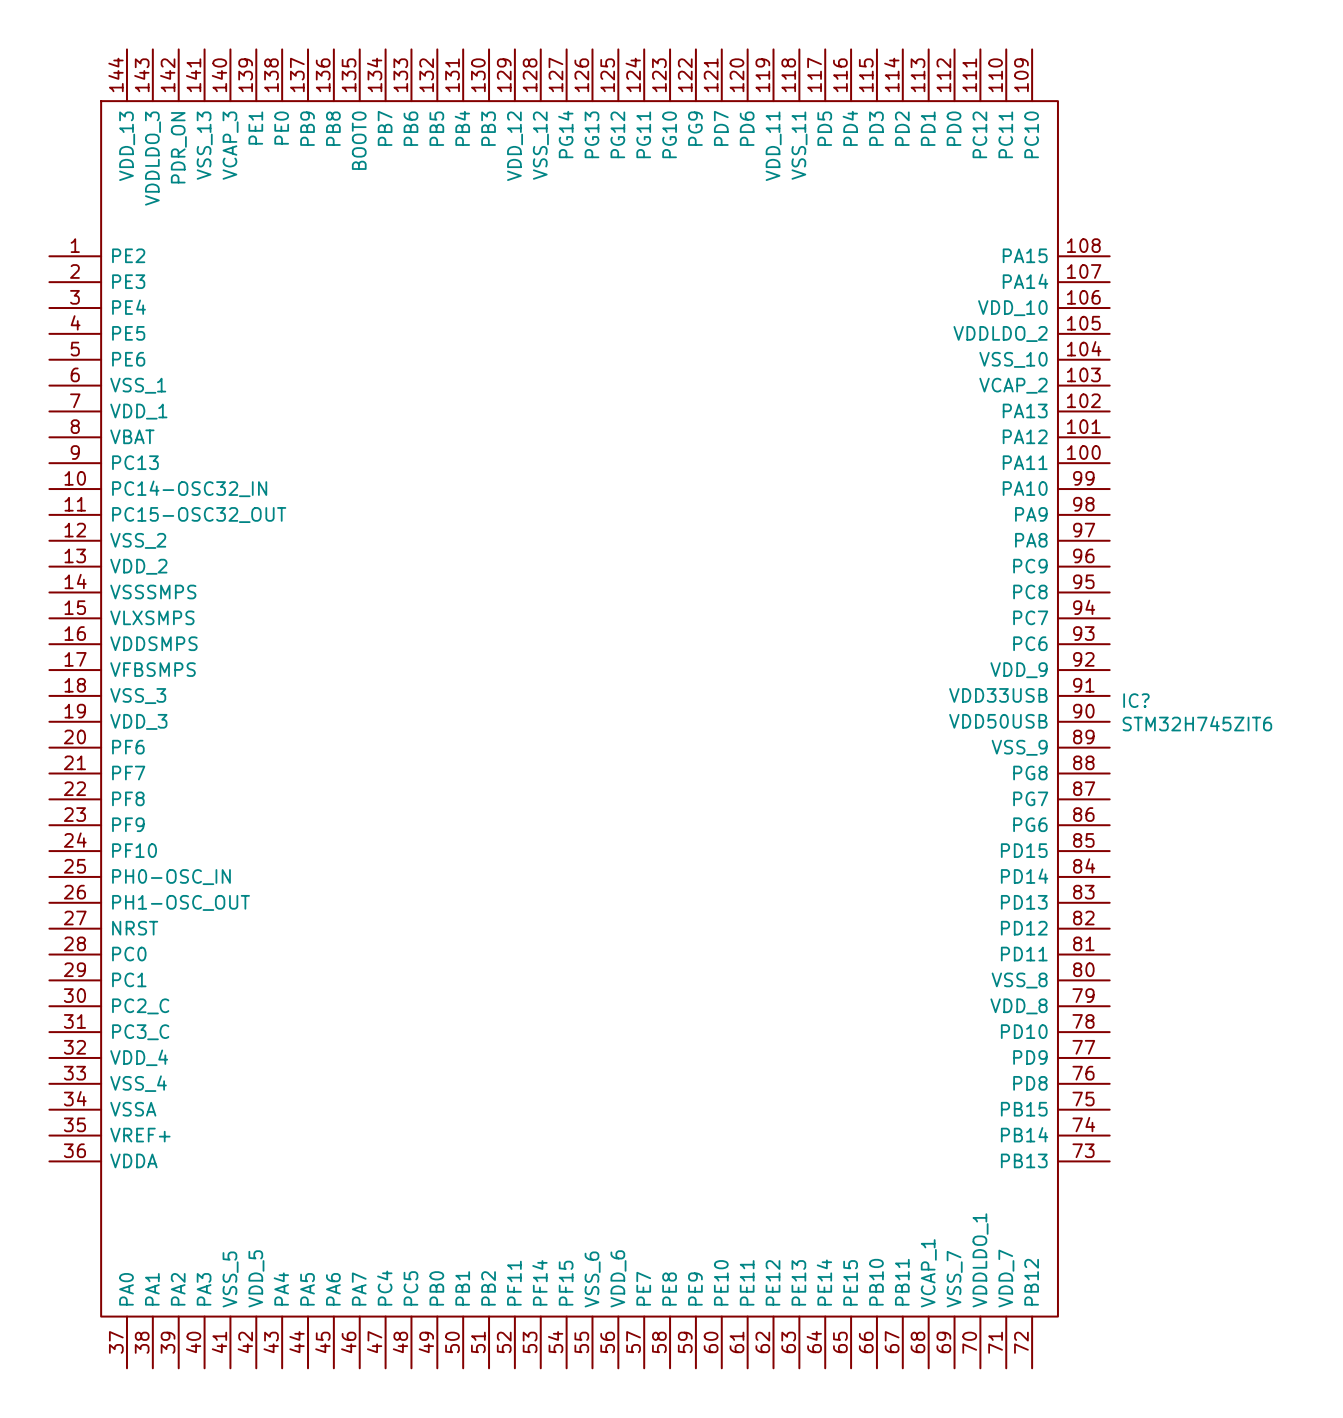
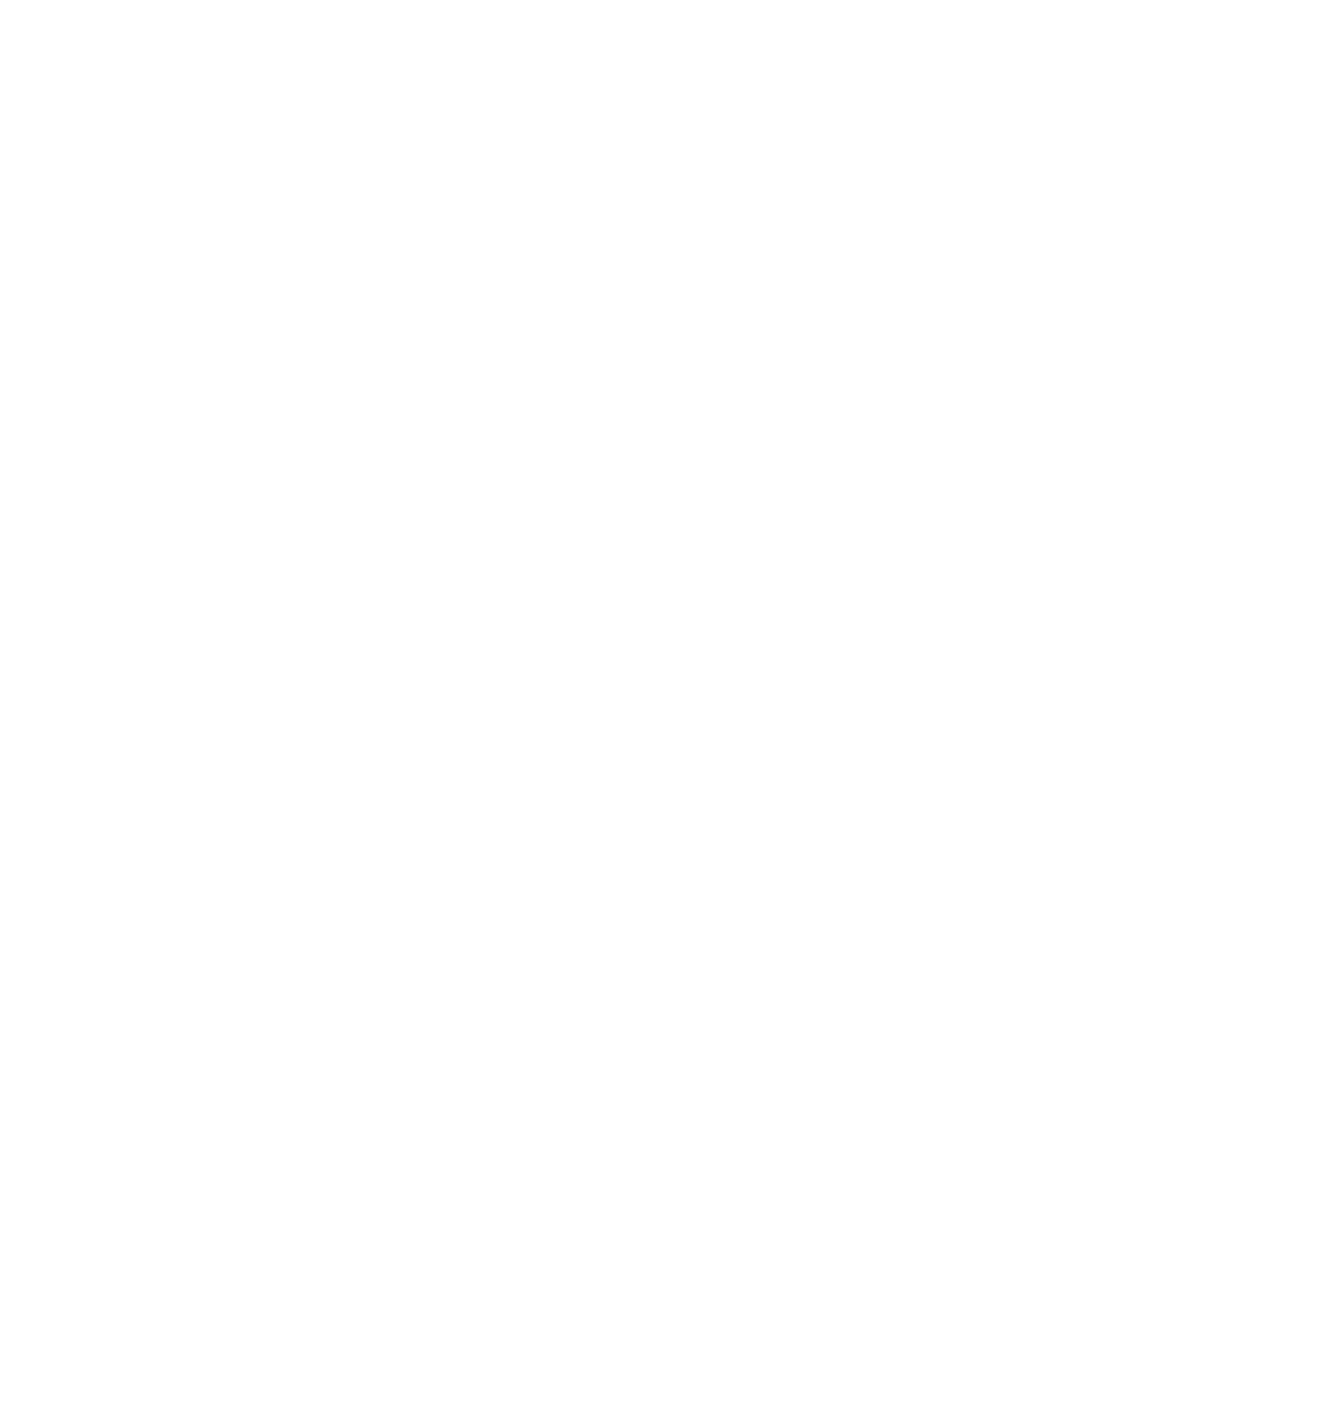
IC?: STM32H745ZIT6 (579, 708) -> none

